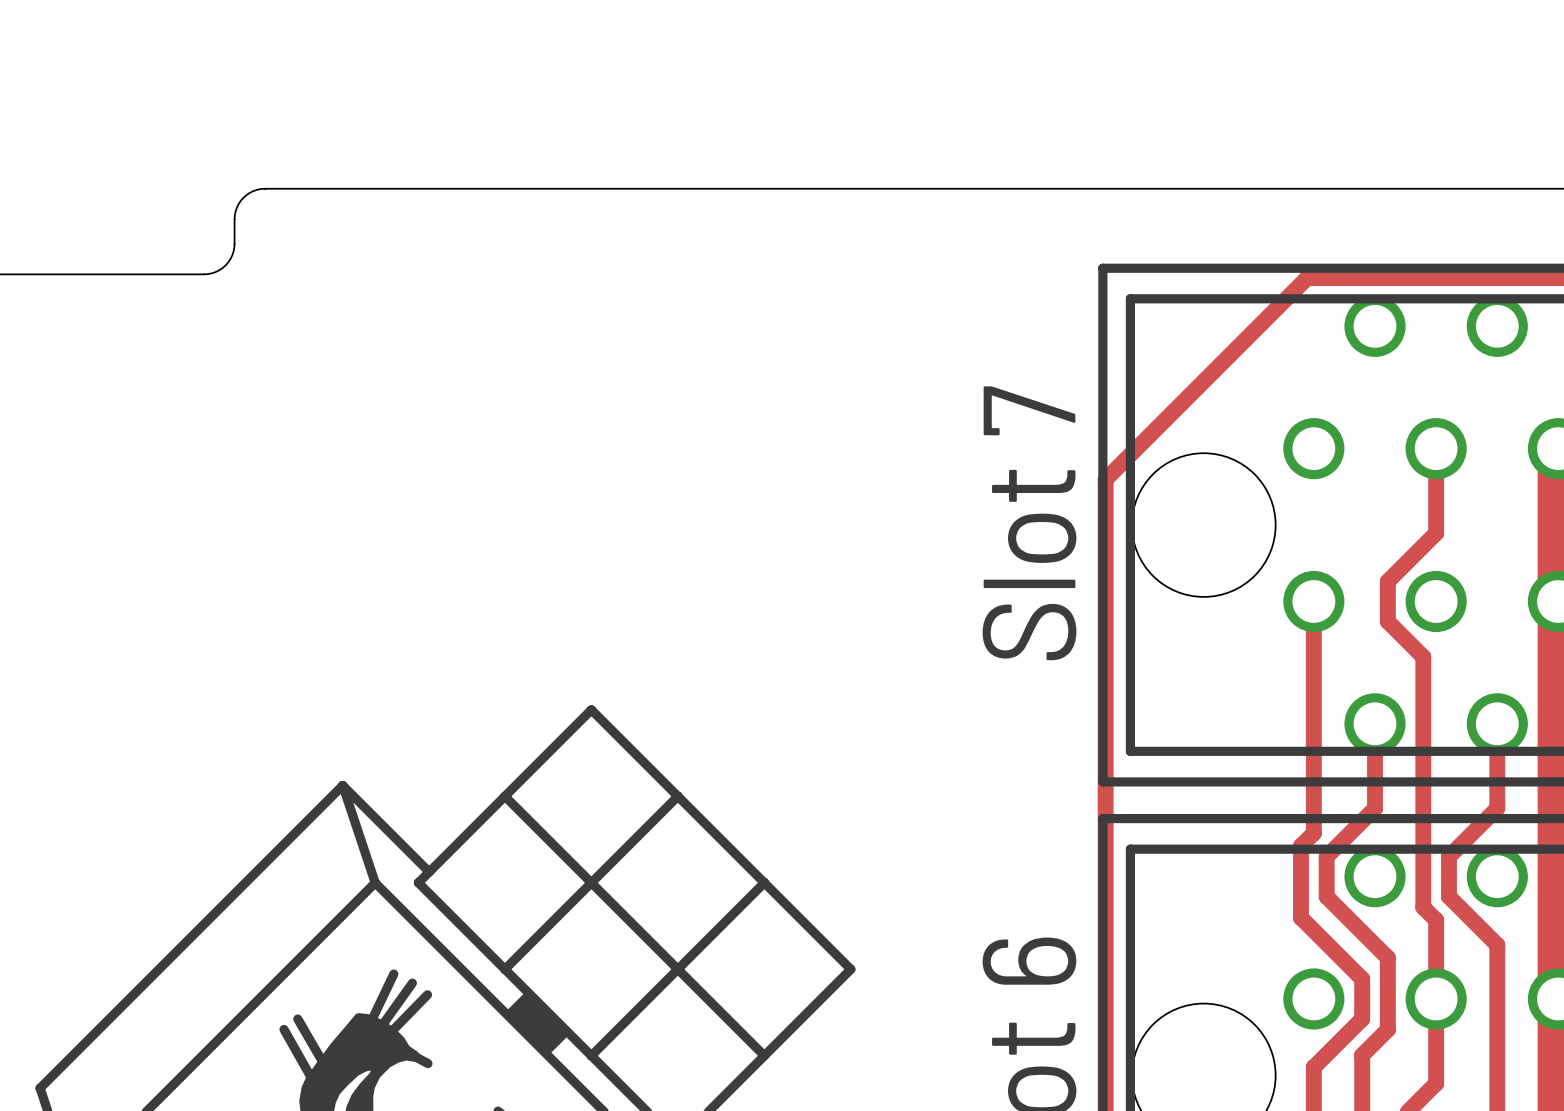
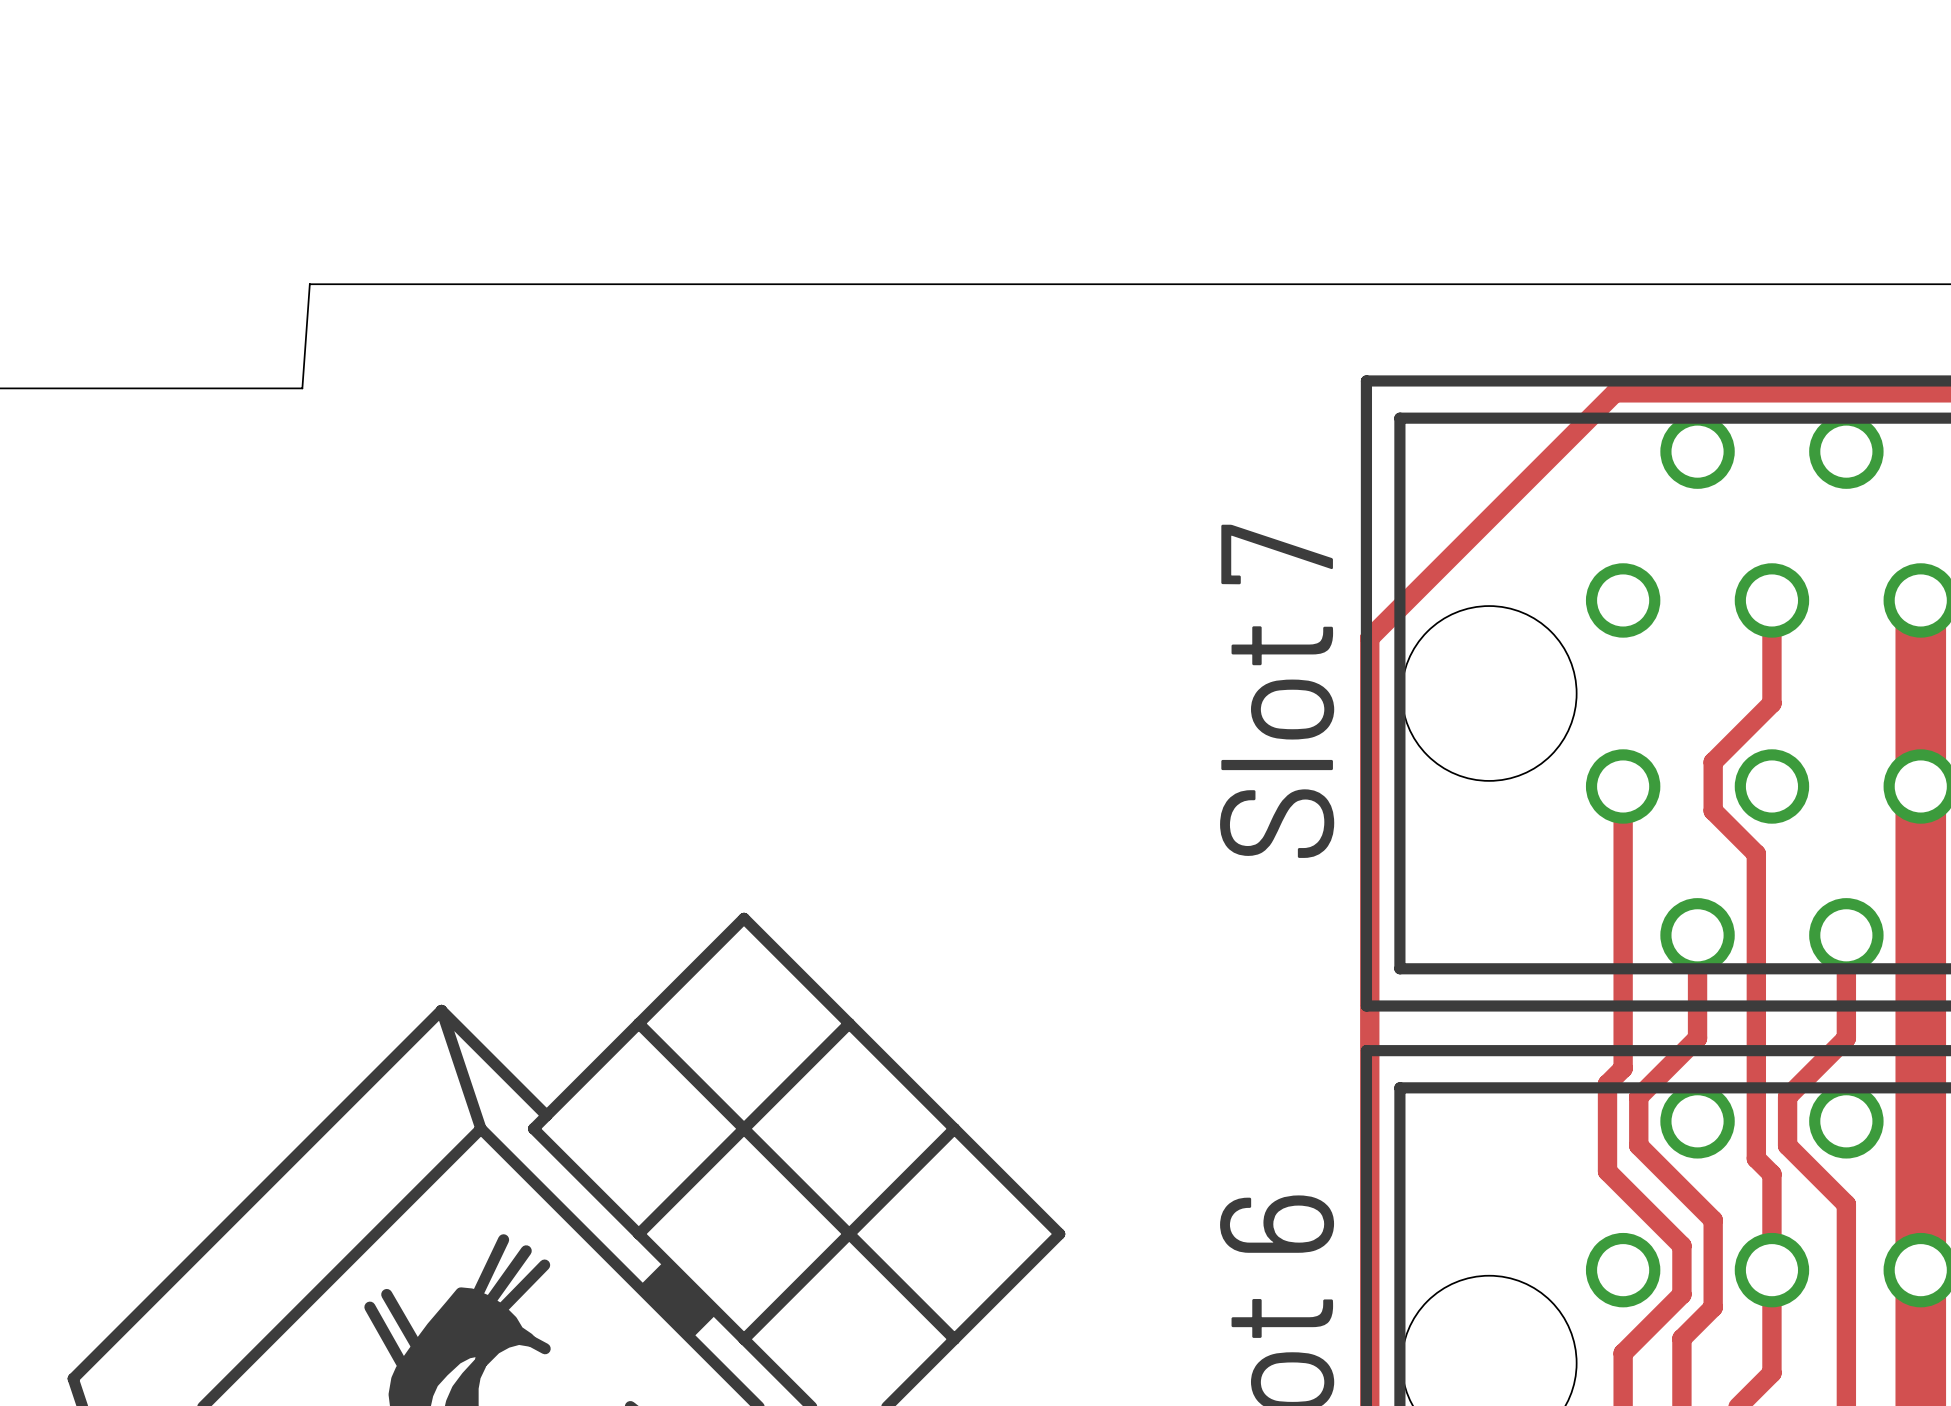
board edge: (265, 188) (249, 192) (238, 204) (234, 215) (234, 247) (228, 262) (219, 270) (203, 274) -> (347, 284) (309, 284) (302, 388) (272, 388)

